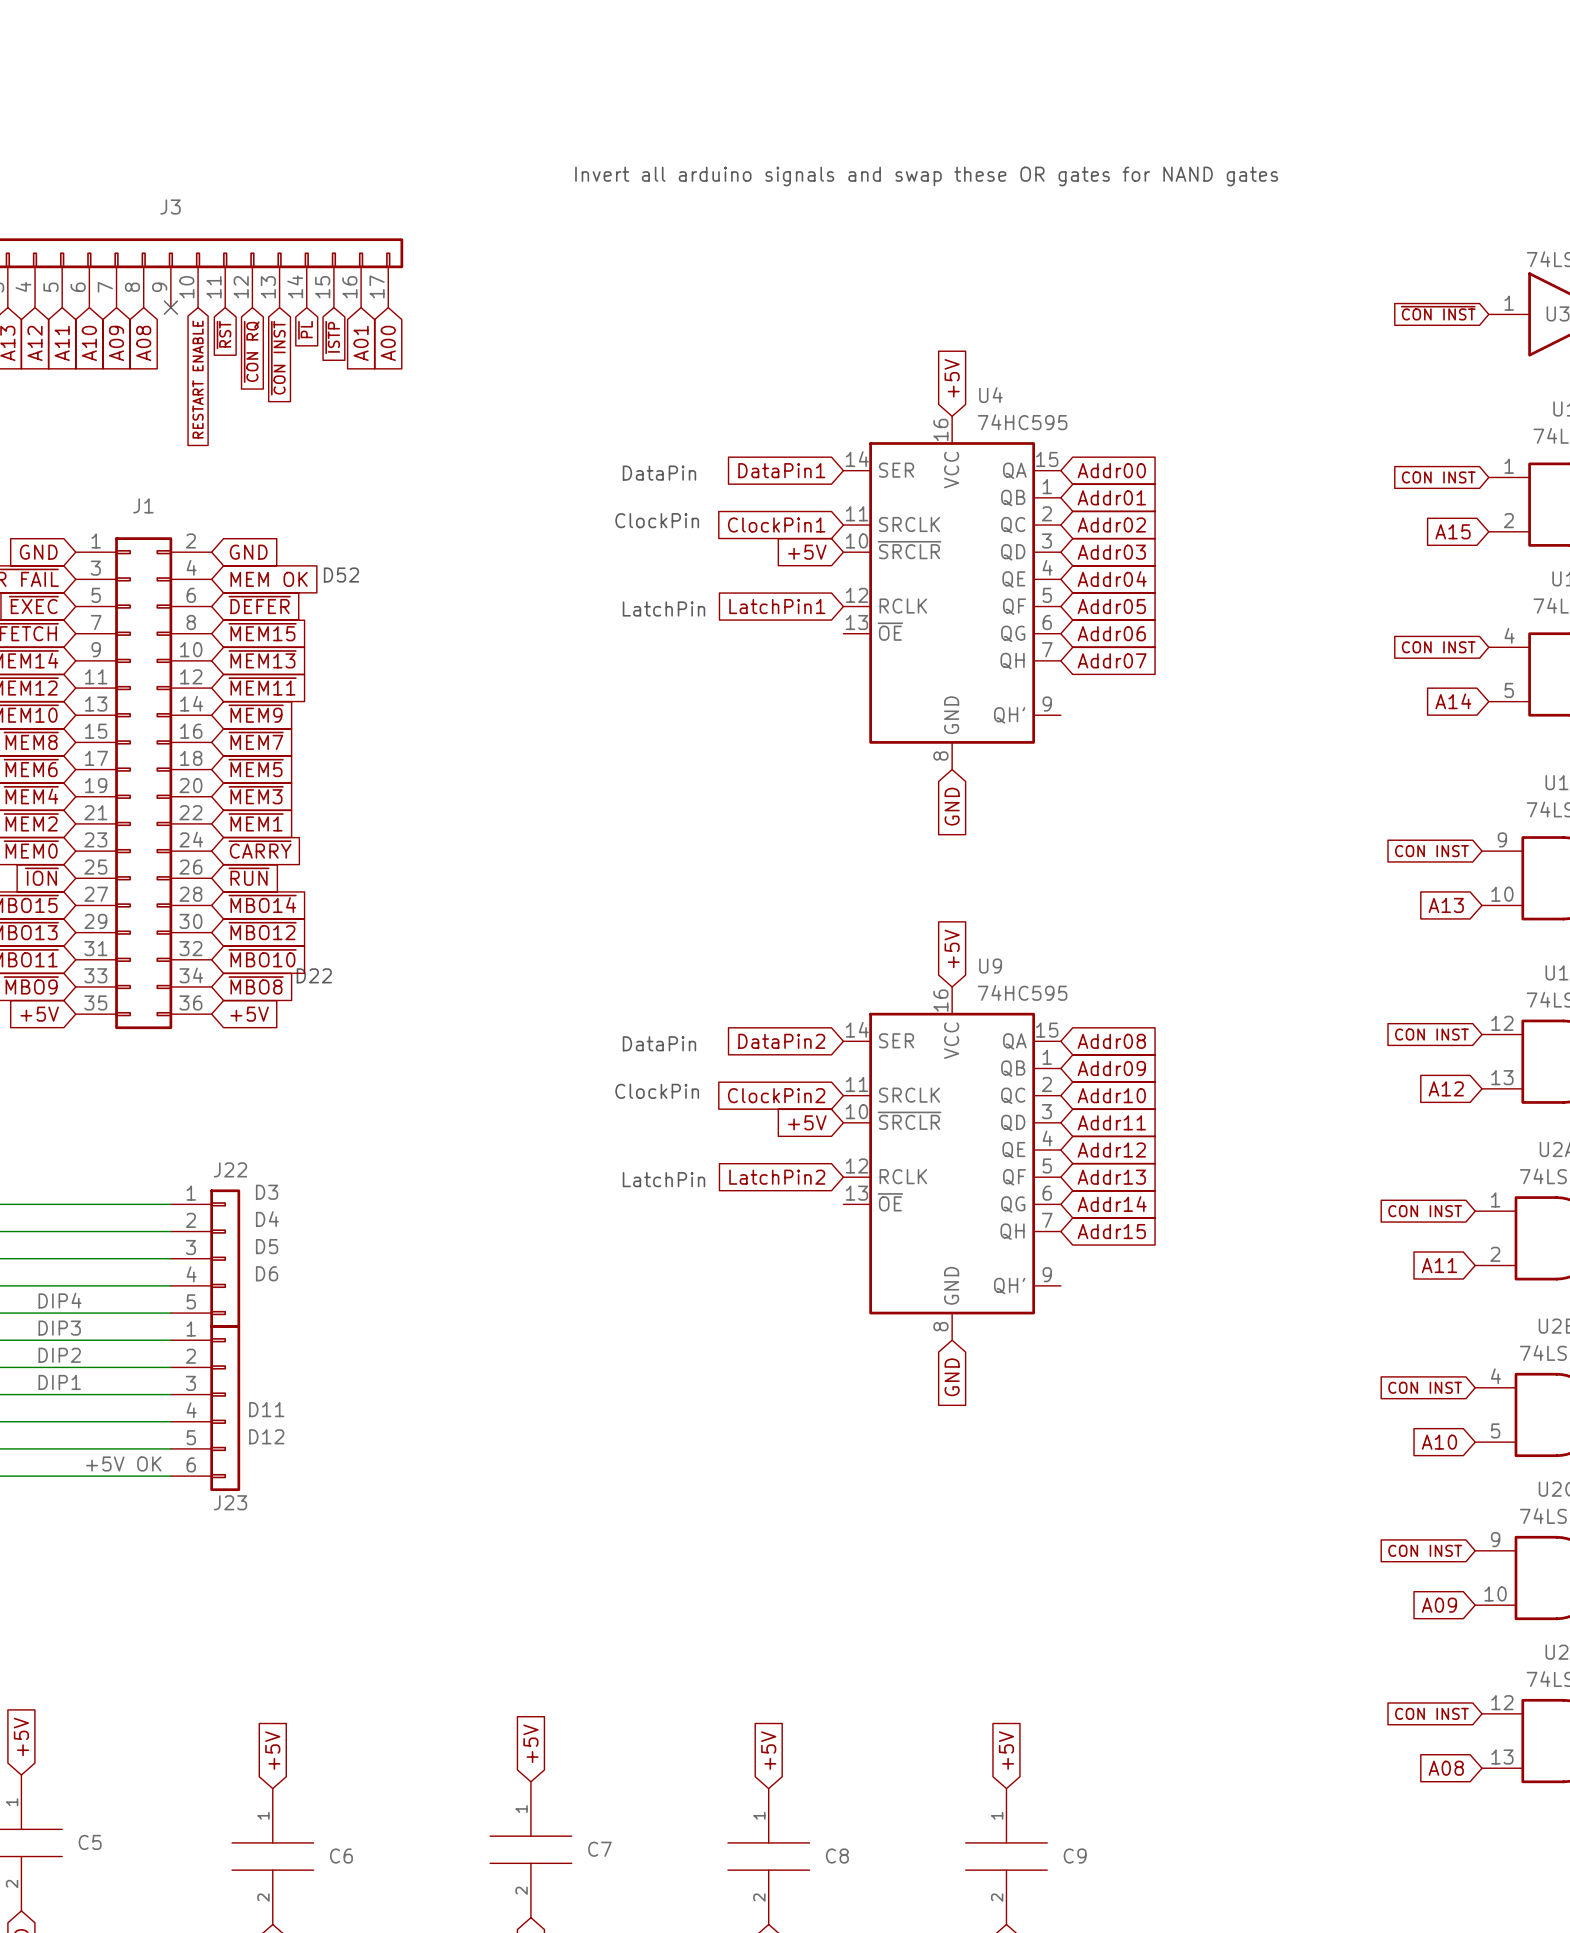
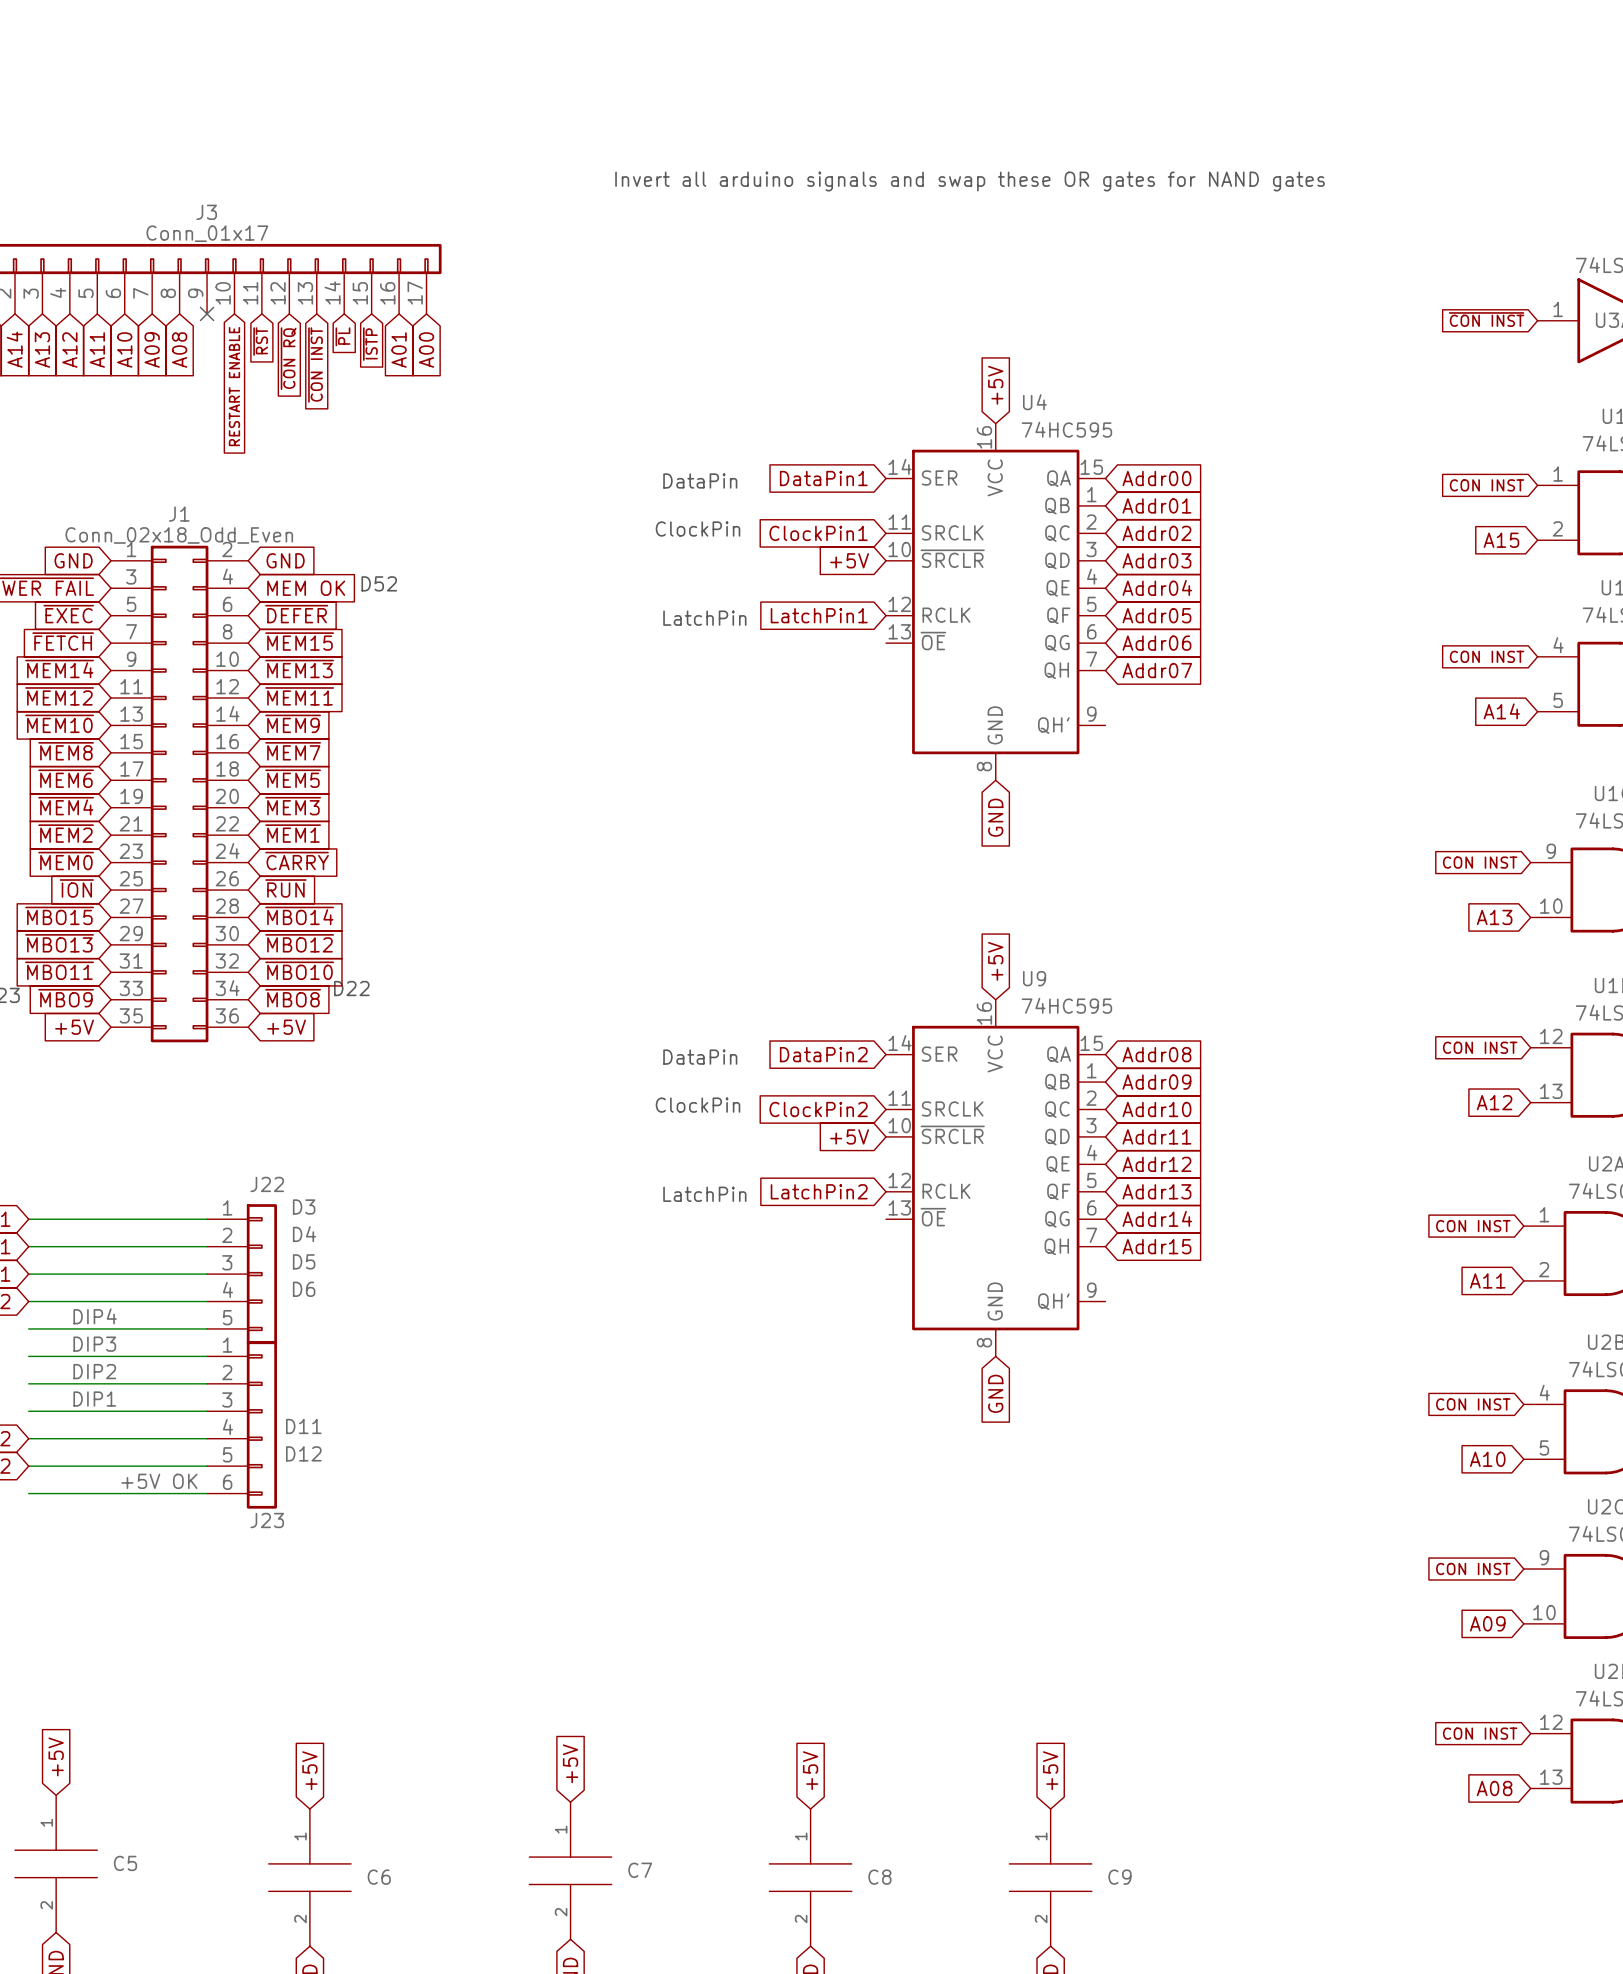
J3 value: none -> Conn_01x17 (207, 233)
J1 value: none -> Conn_02x18_Odd_Even (179, 535)

